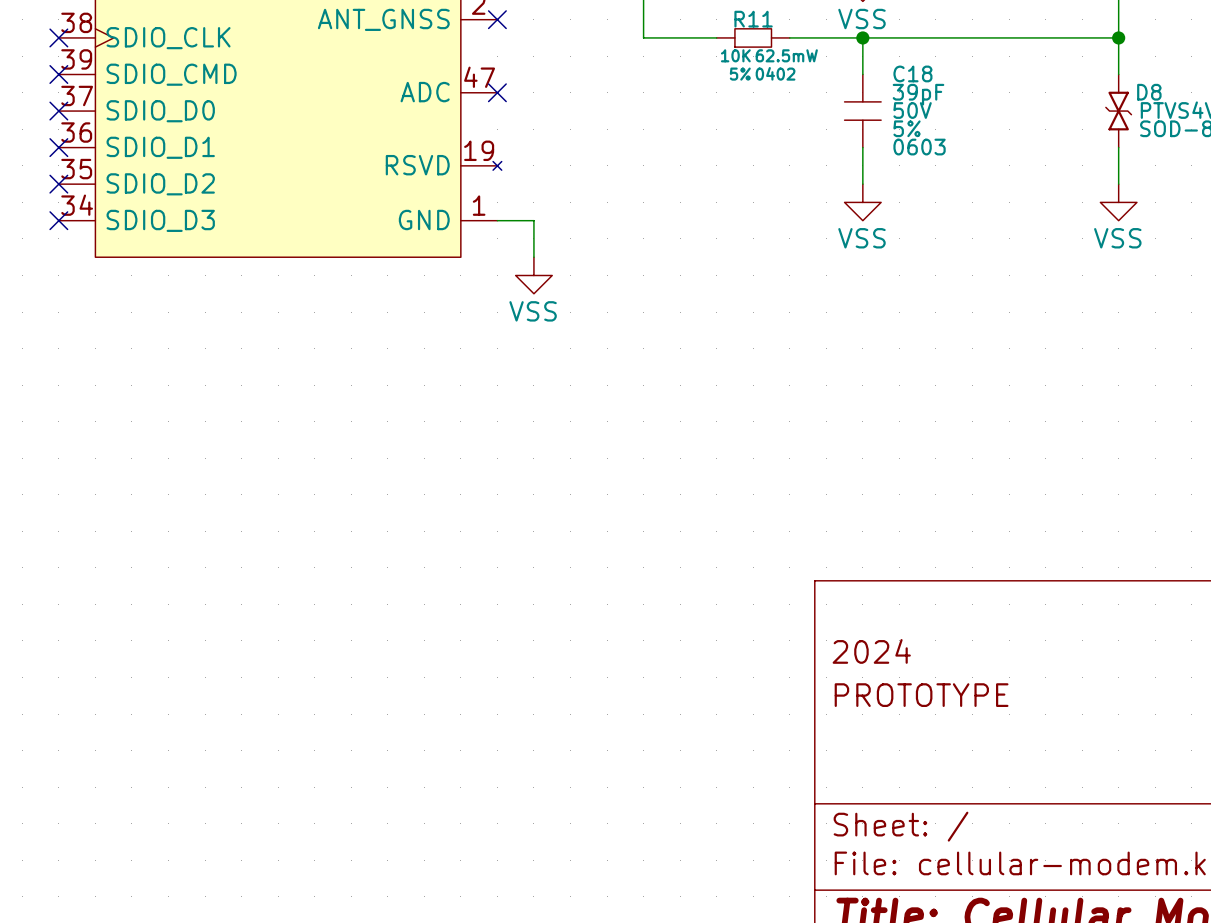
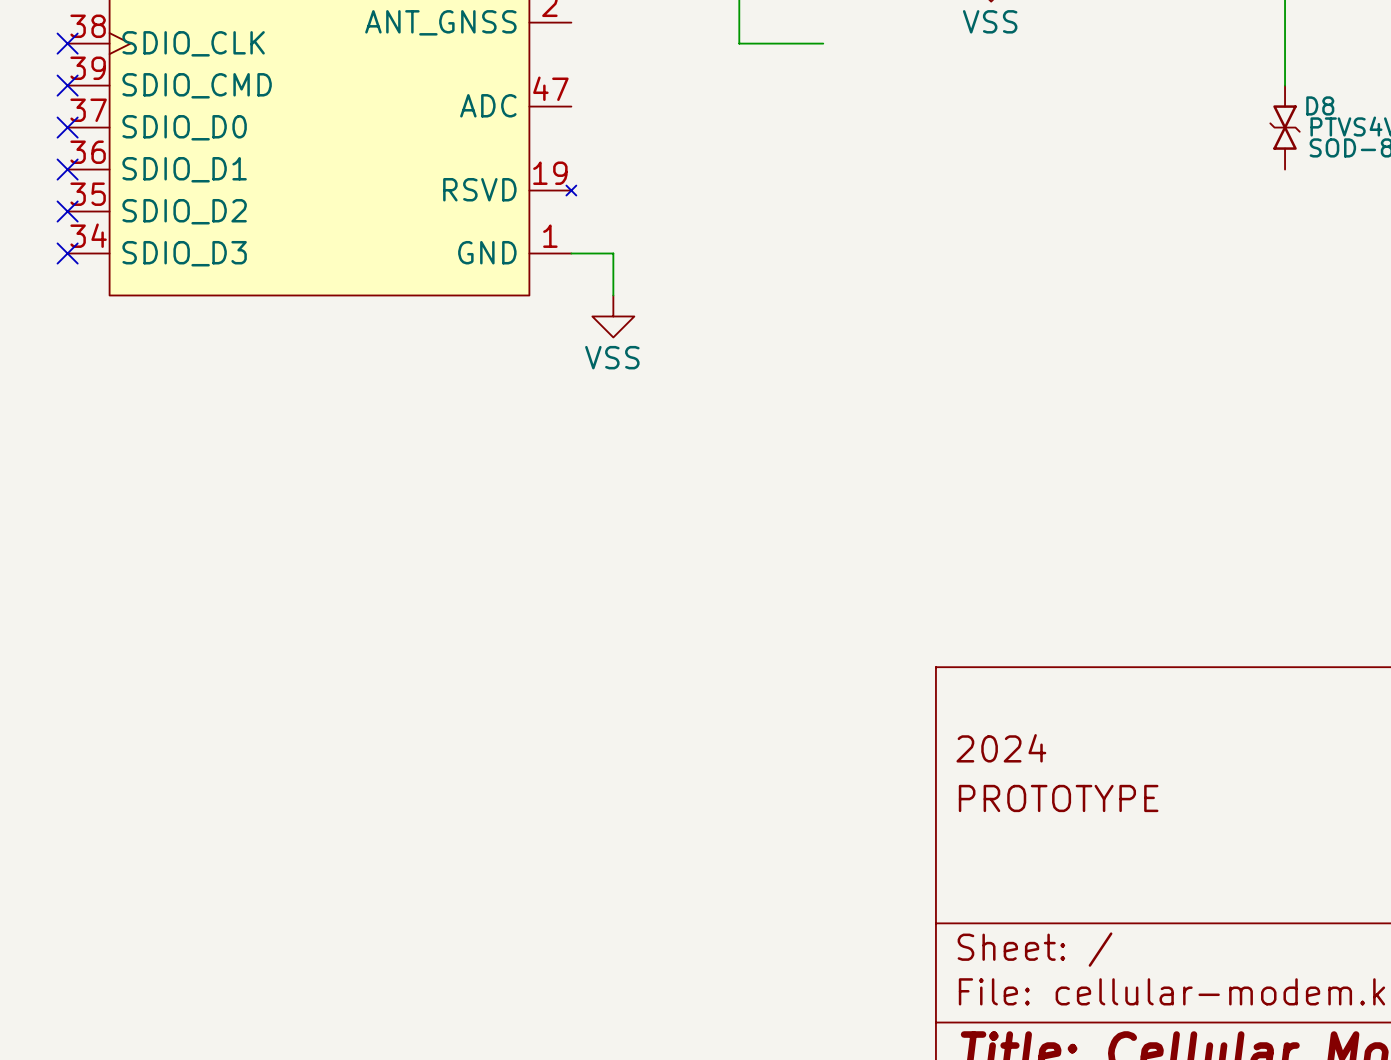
no-connect mark: (497, 19) -> none
R11: 10K (753, 37) -> none
wire: (789, 37) (1118, 37) -> none
wire: (862, 37) (862, 74) -> none
junction: (862, 37) -> none
junction: (1118, 37) -> none
no-connect mark: (497, 92) -> none
C18: 39pF (862, 111) -> none
wire: (862, 147) (862, 184) -> none
wire: (1118, 147) (1118, 184) -> none
power symbol: VSS (862, 202) -> none
power symbol: VSS (1118, 202) -> none

